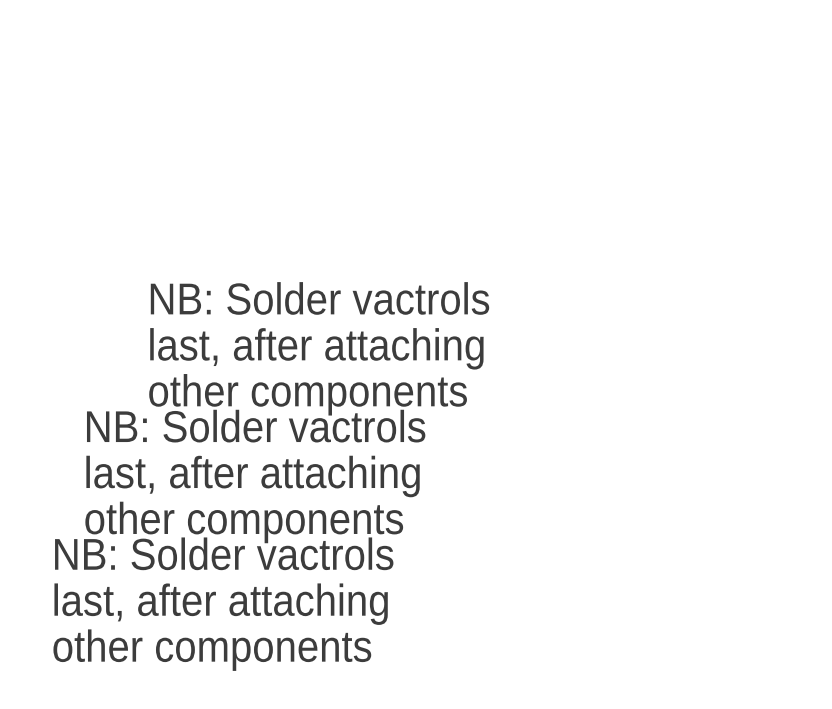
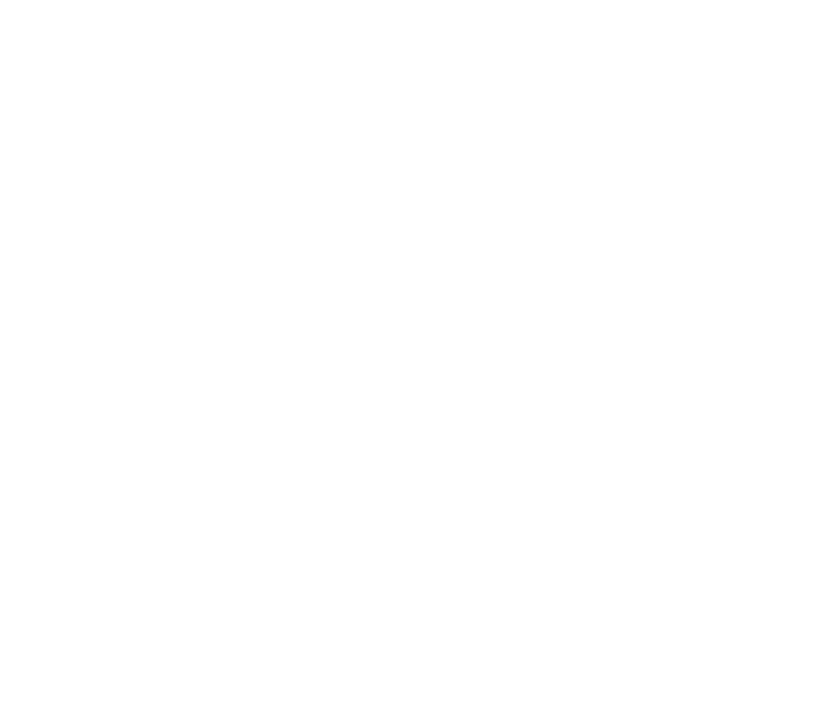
text: NB: Solder vactrols (319, 298) -> none
text: last, after attaching (316, 348) -> none
text: other components (308, 394) -> none
text: NB: Solder vactrols (256, 426) -> none
text: last, after attaching (253, 476) -> none
text: other components (244, 522) -> none
text: NB: Solder vactrols (224, 553) -> none
text: last, after attaching (221, 604) -> none
text: other components (212, 650) -> none

